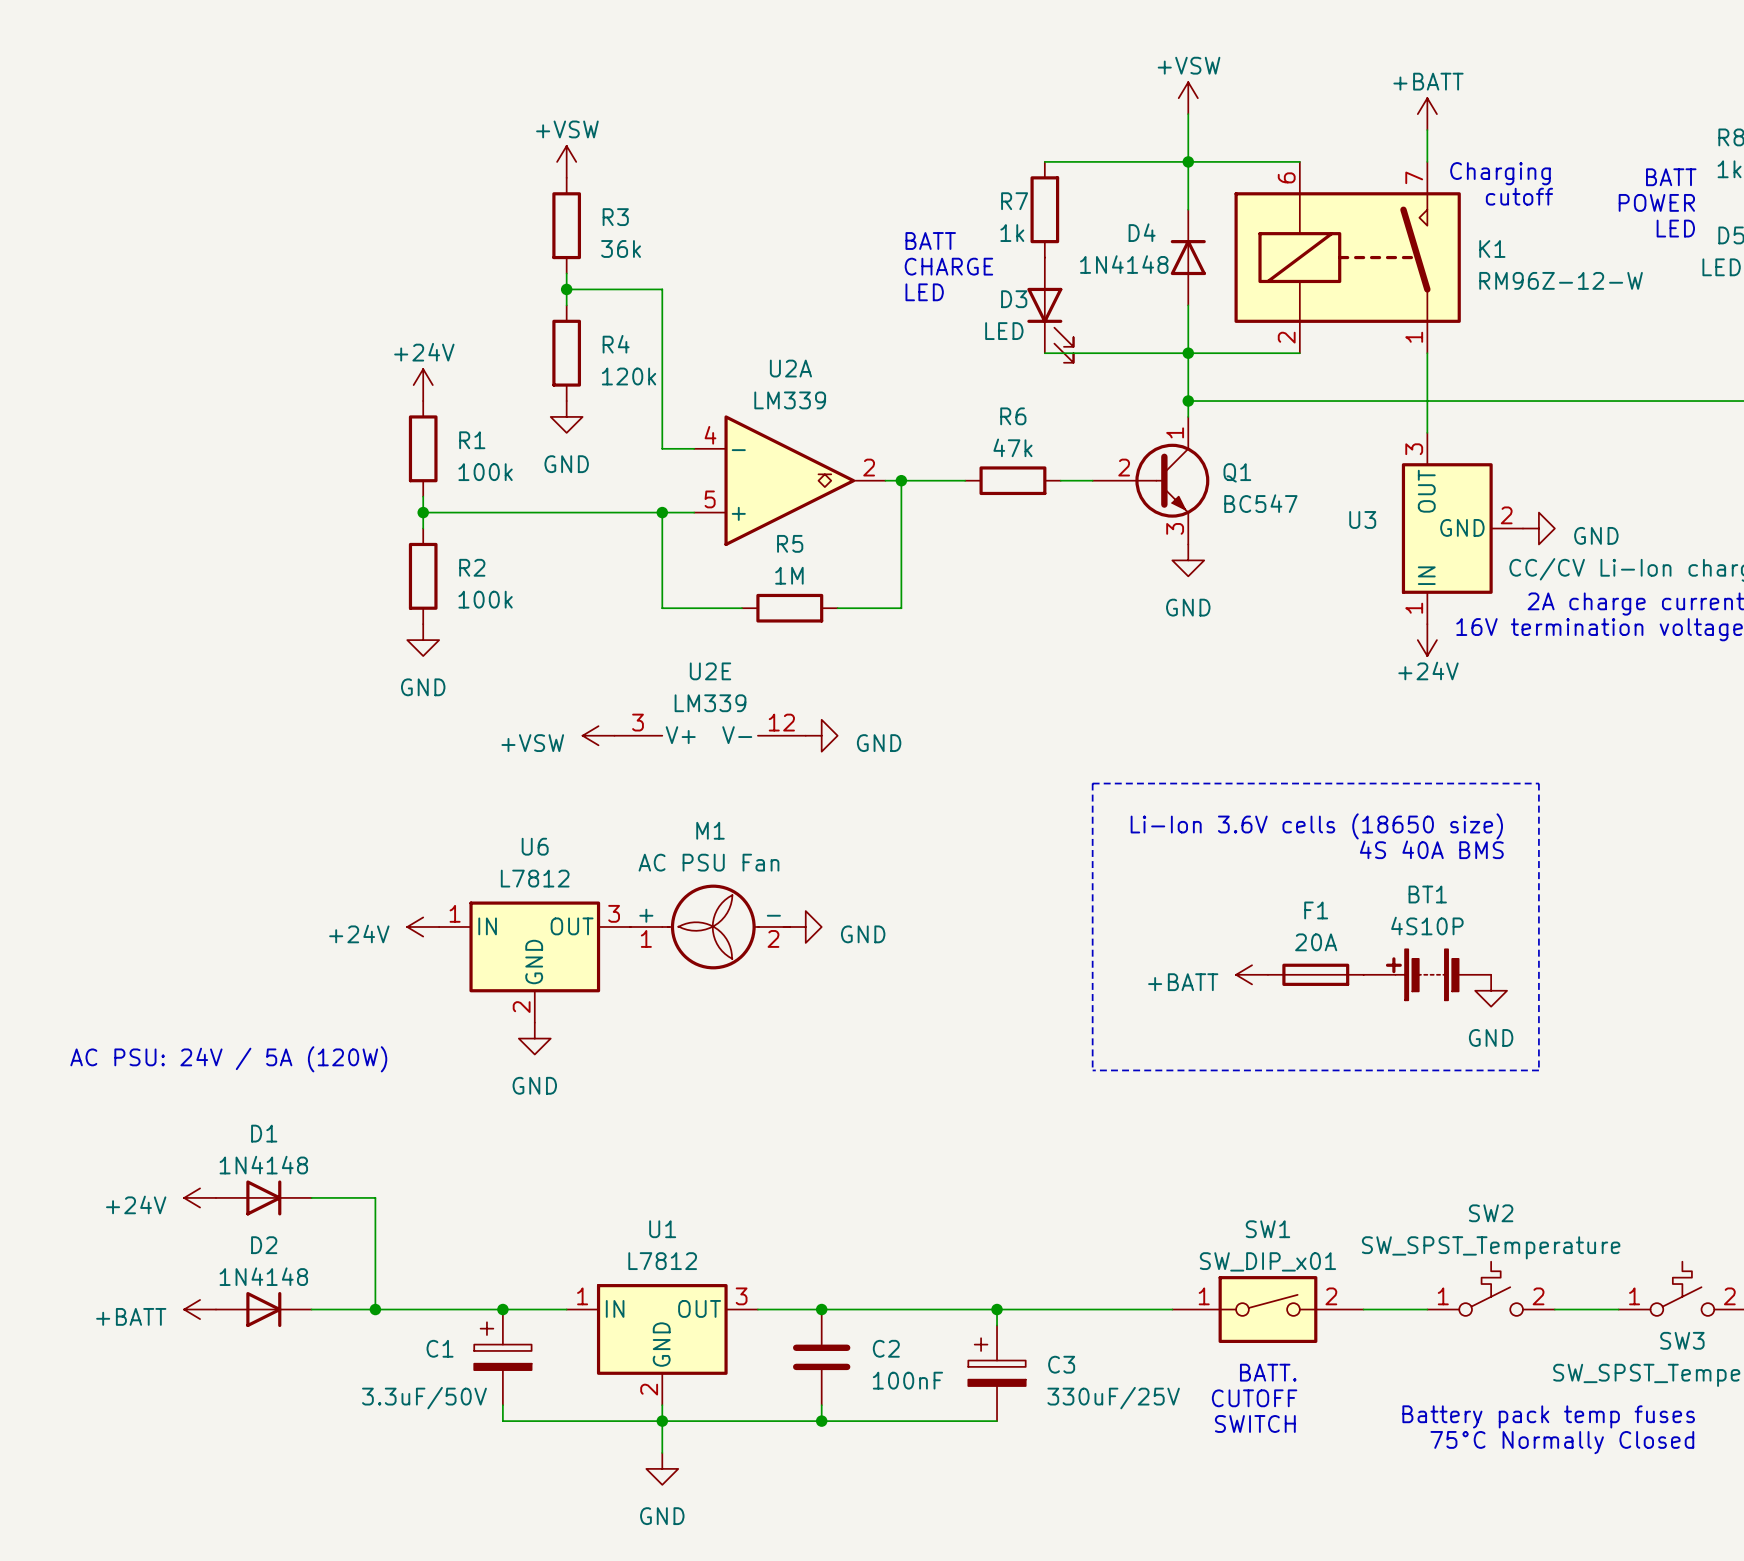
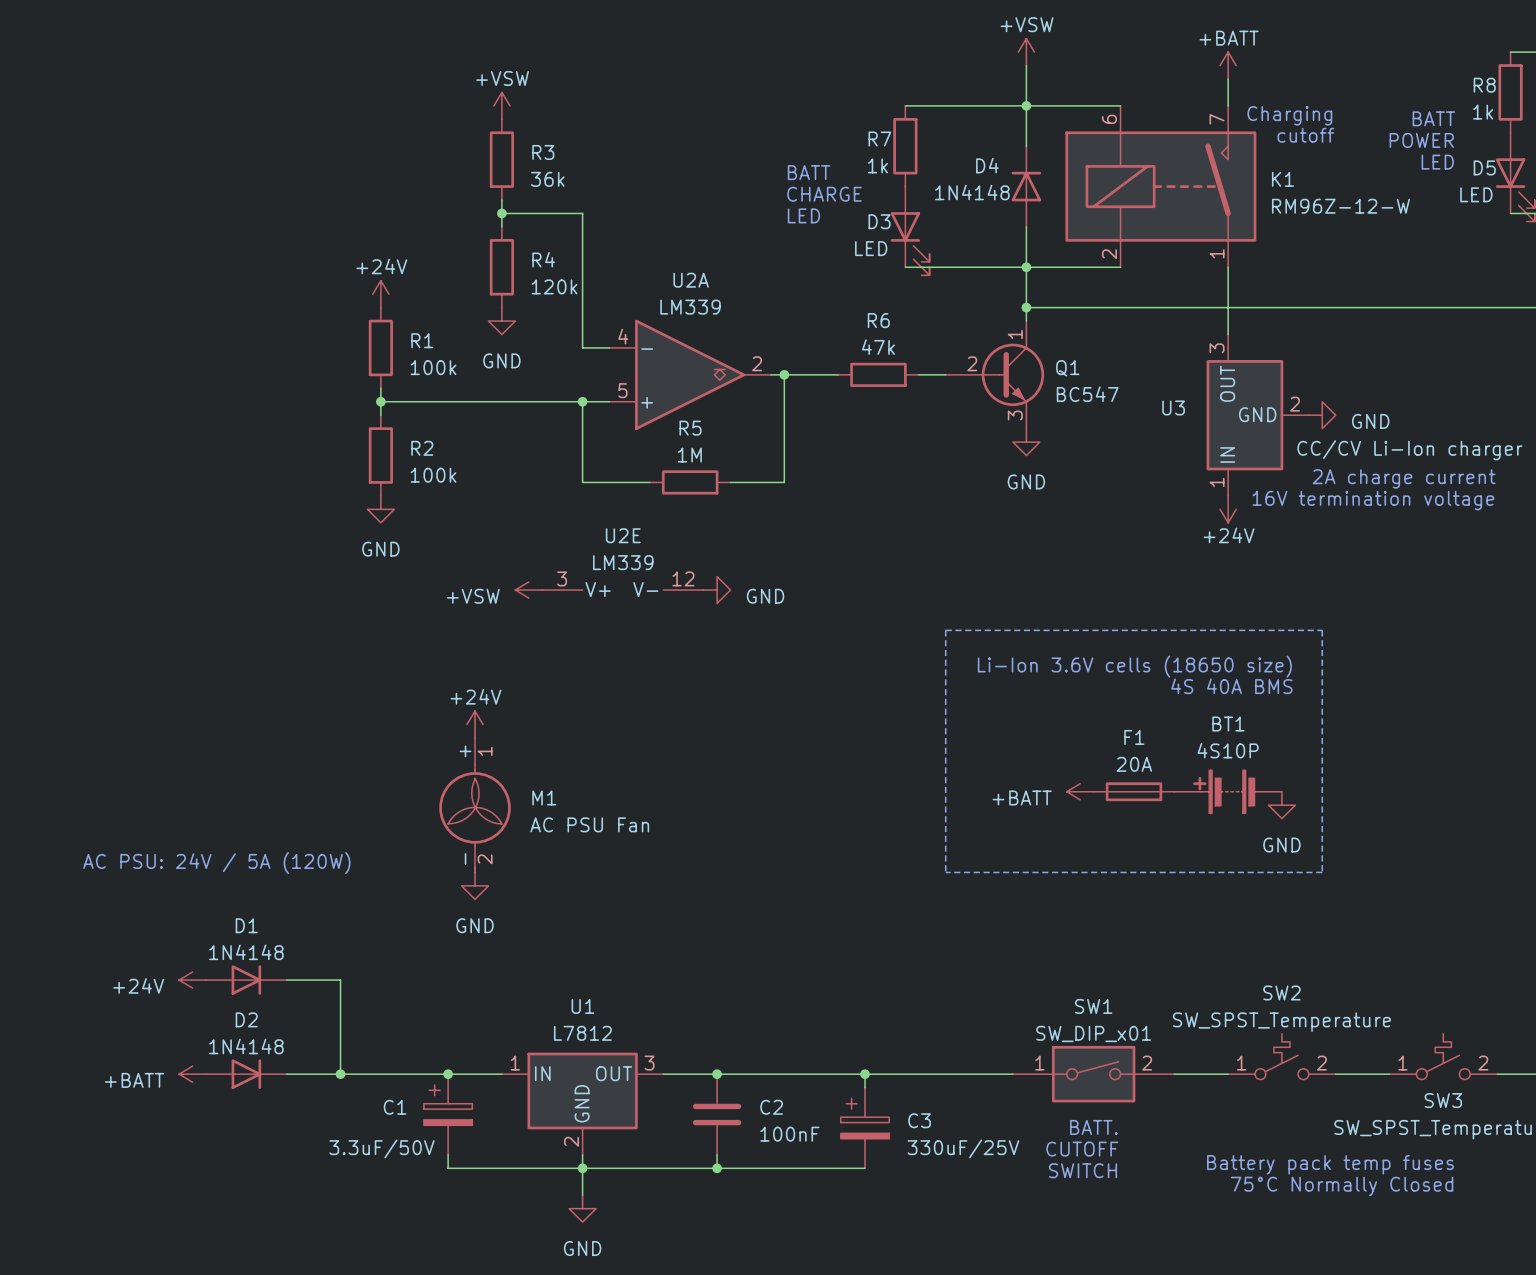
M1 value position: AC PSU Fan (708, 862) -> AC PSU Fan (589, 824)
power symbol rotation: 0° (423, 926) -> 90° clockwise (475, 724)
power symbol position: +24V (423, 926) -> +24V (475, 724)
M1 position: (710, 926) -> (475, 805)
M1 rotation: 0° (726, 926) -> 90° clockwise (475, 818)
power symbol: GND (805, 926) -> none
power symbol text position: +24V (359, 933) -> +24V (475, 696)
U6: L7812 (534, 962) -> none
power symbol position: GND (534, 1038) -> GND (475, 885)

